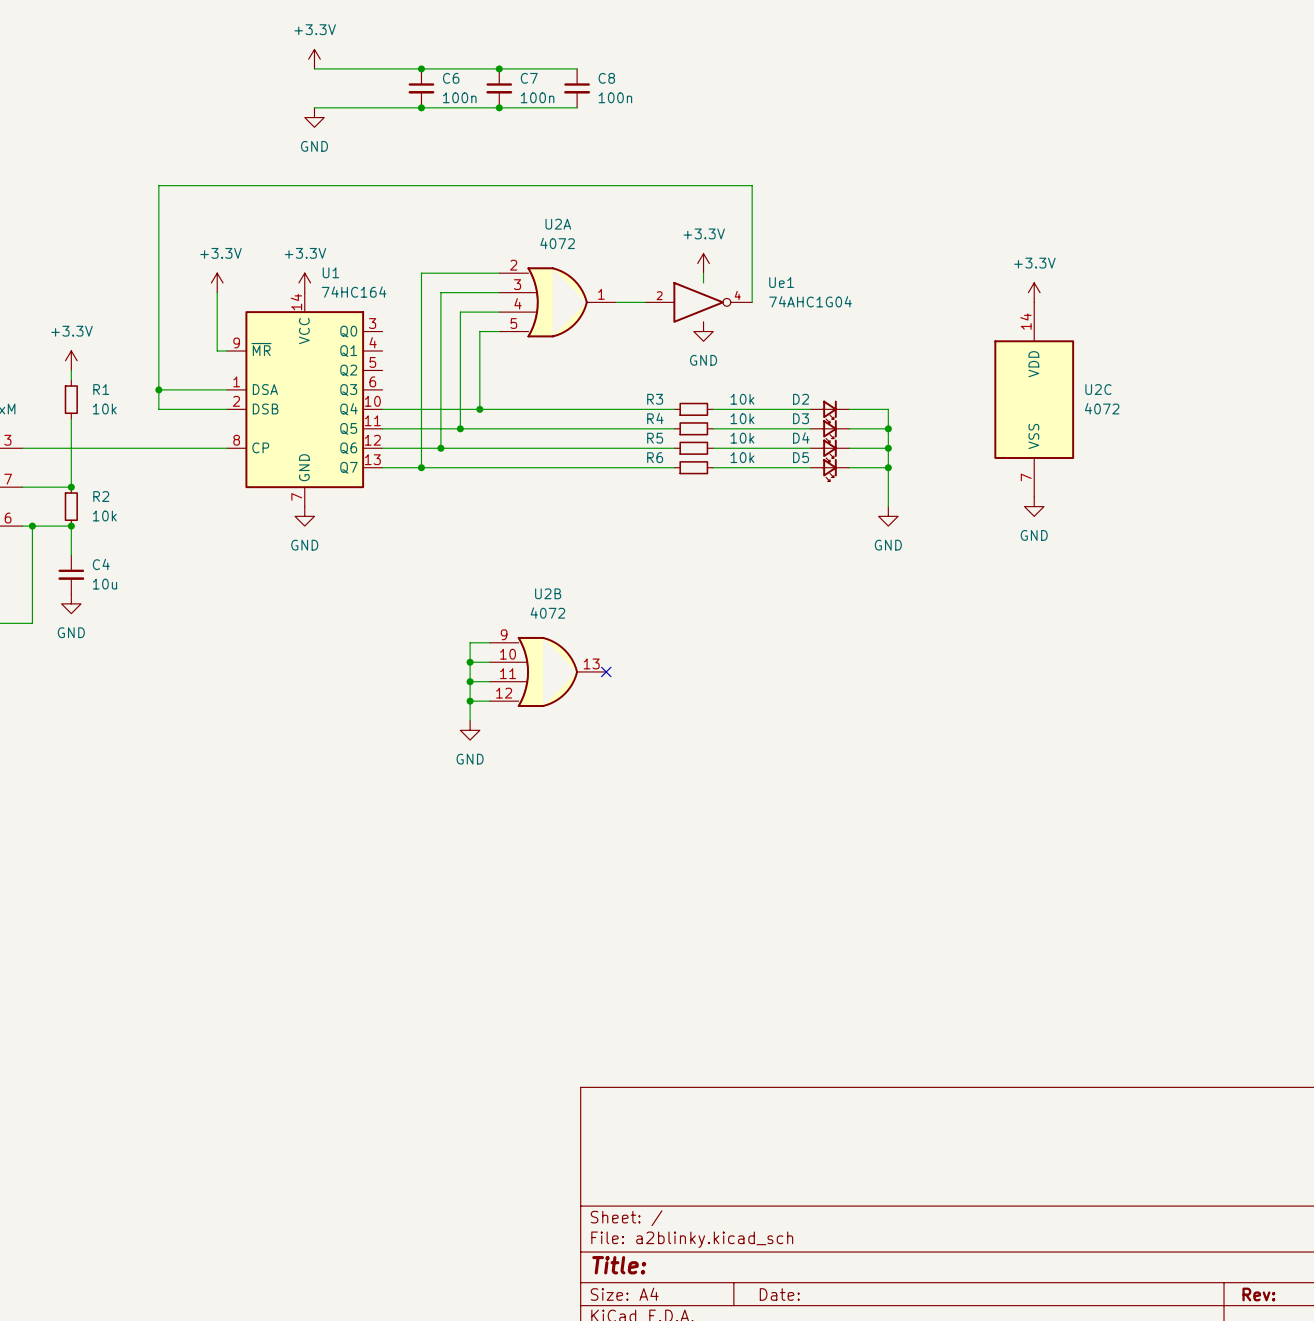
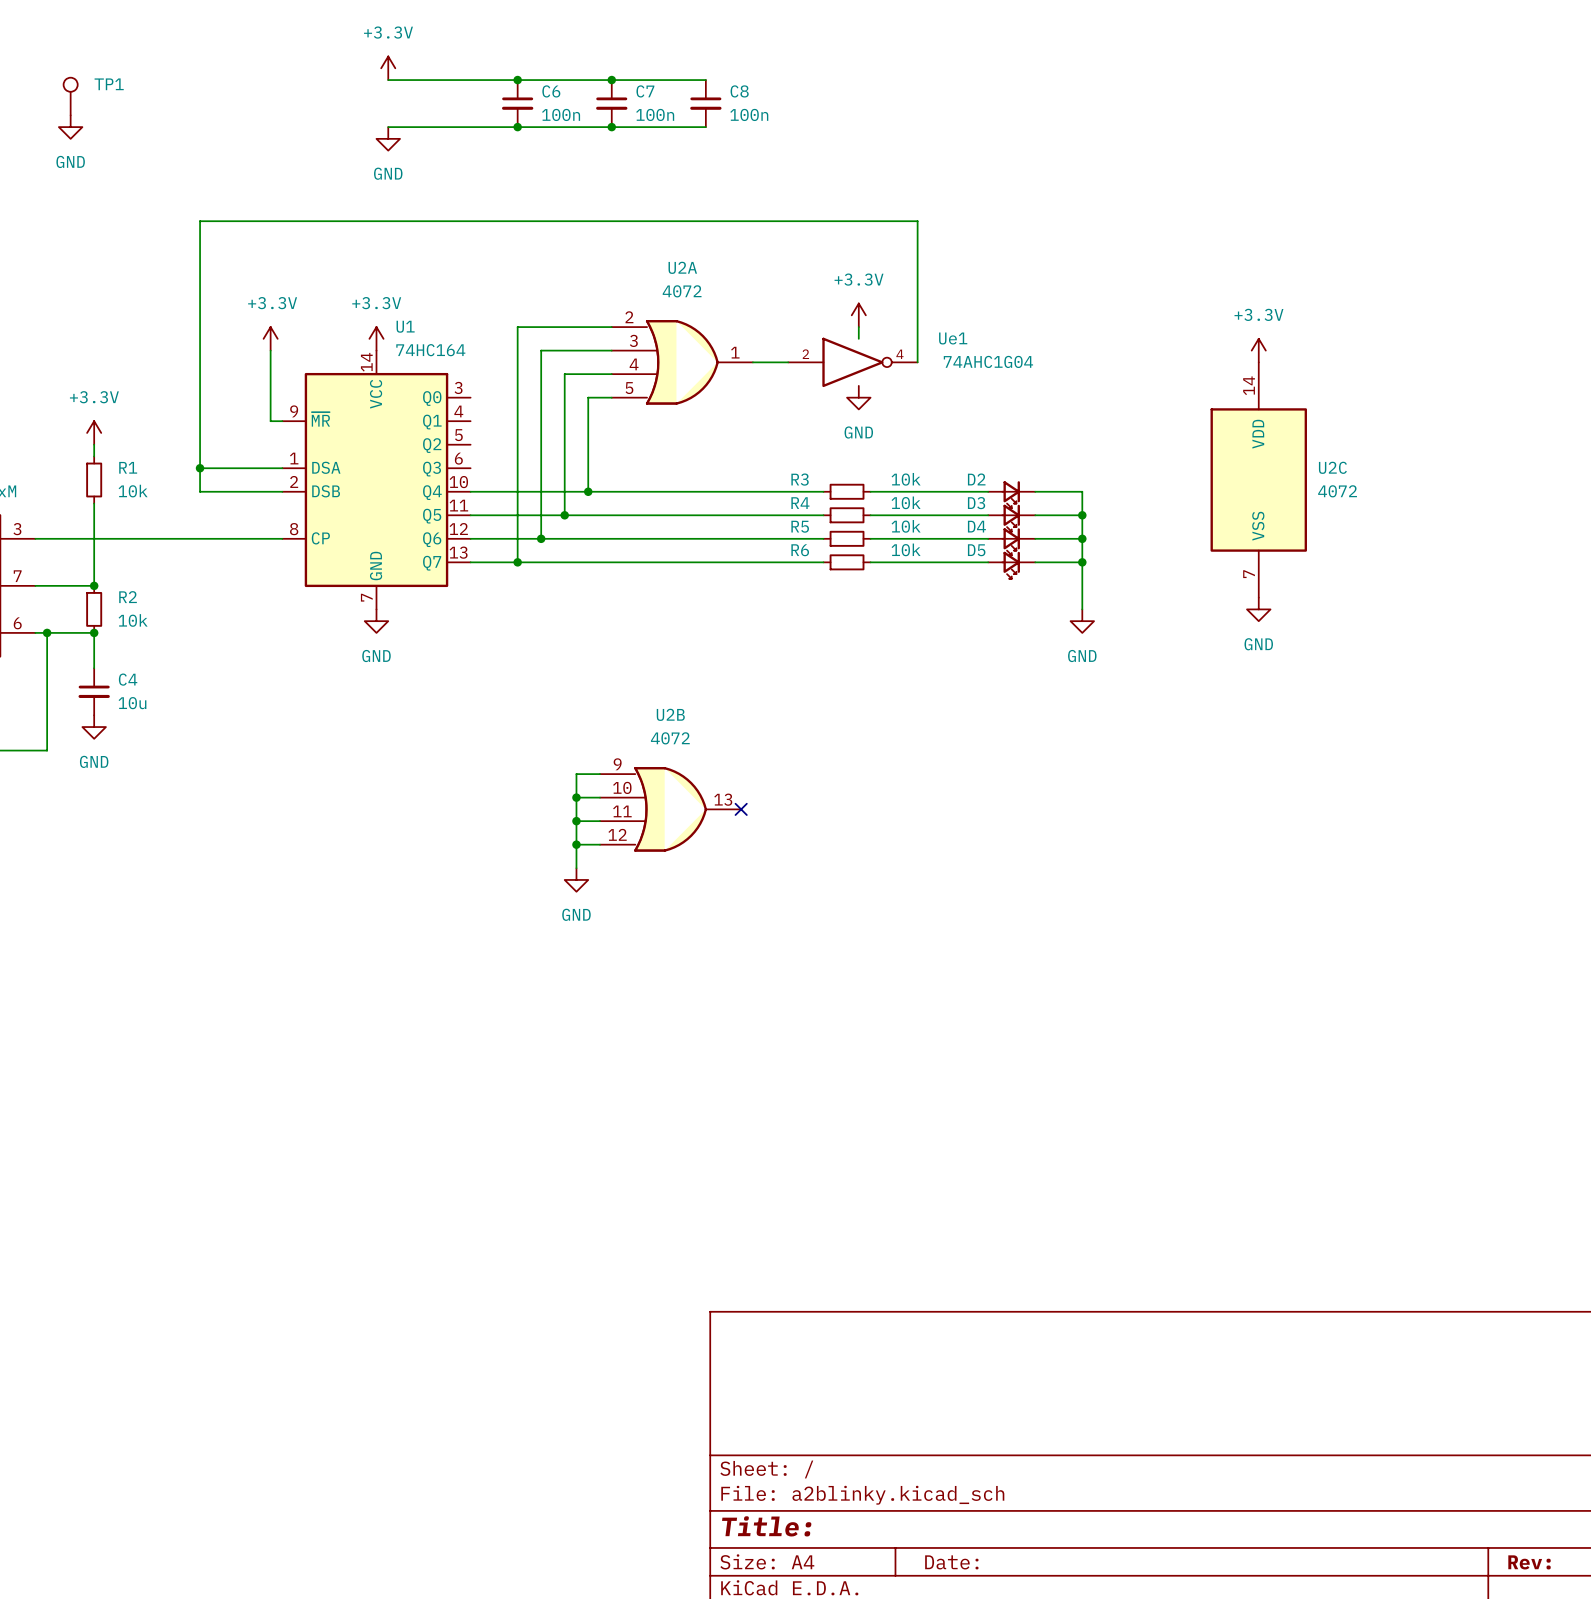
TP1: none -> (70, 96)
power symbol: none -> GND (70, 127)

